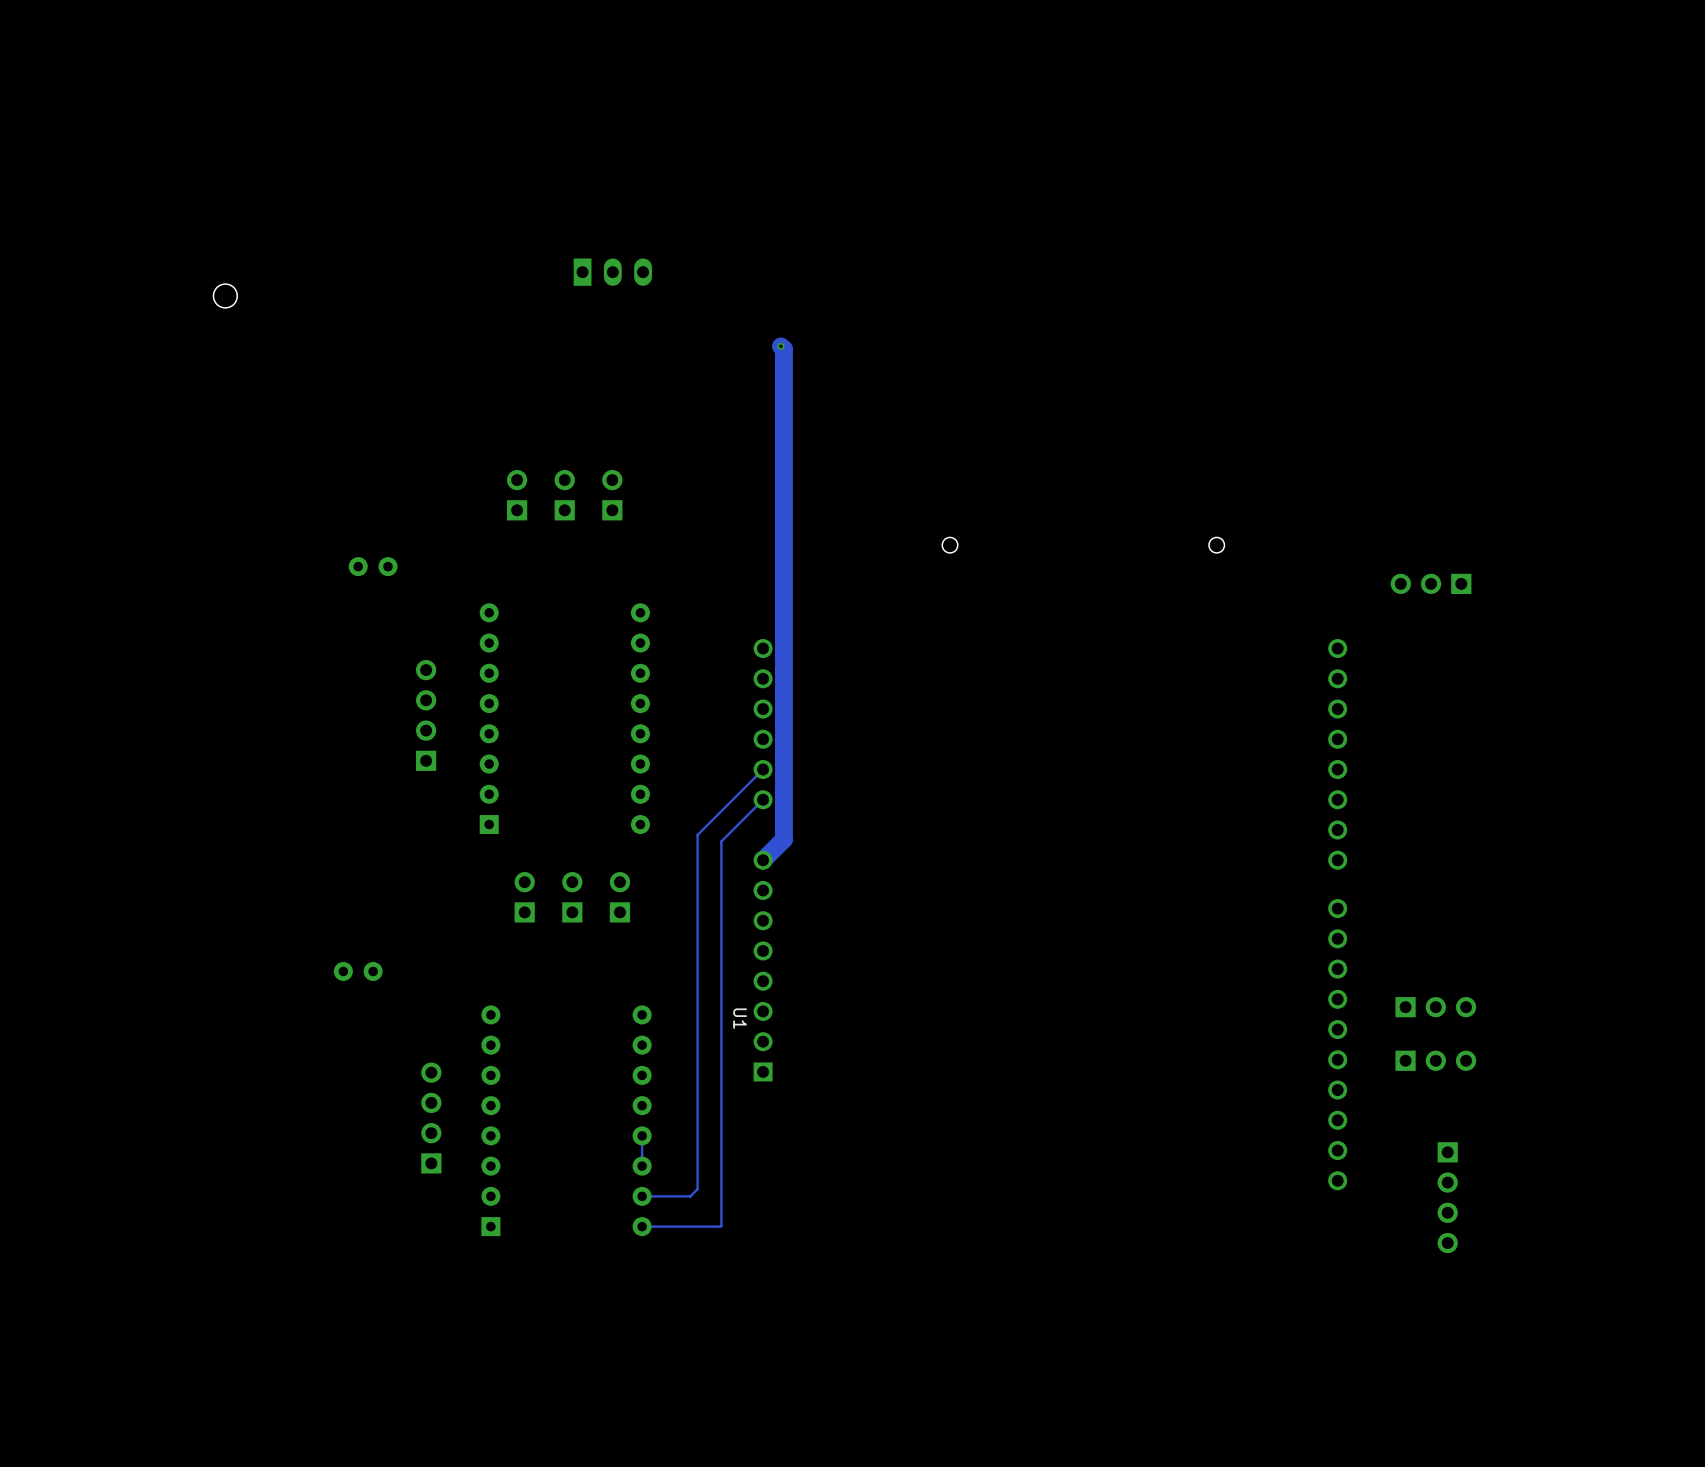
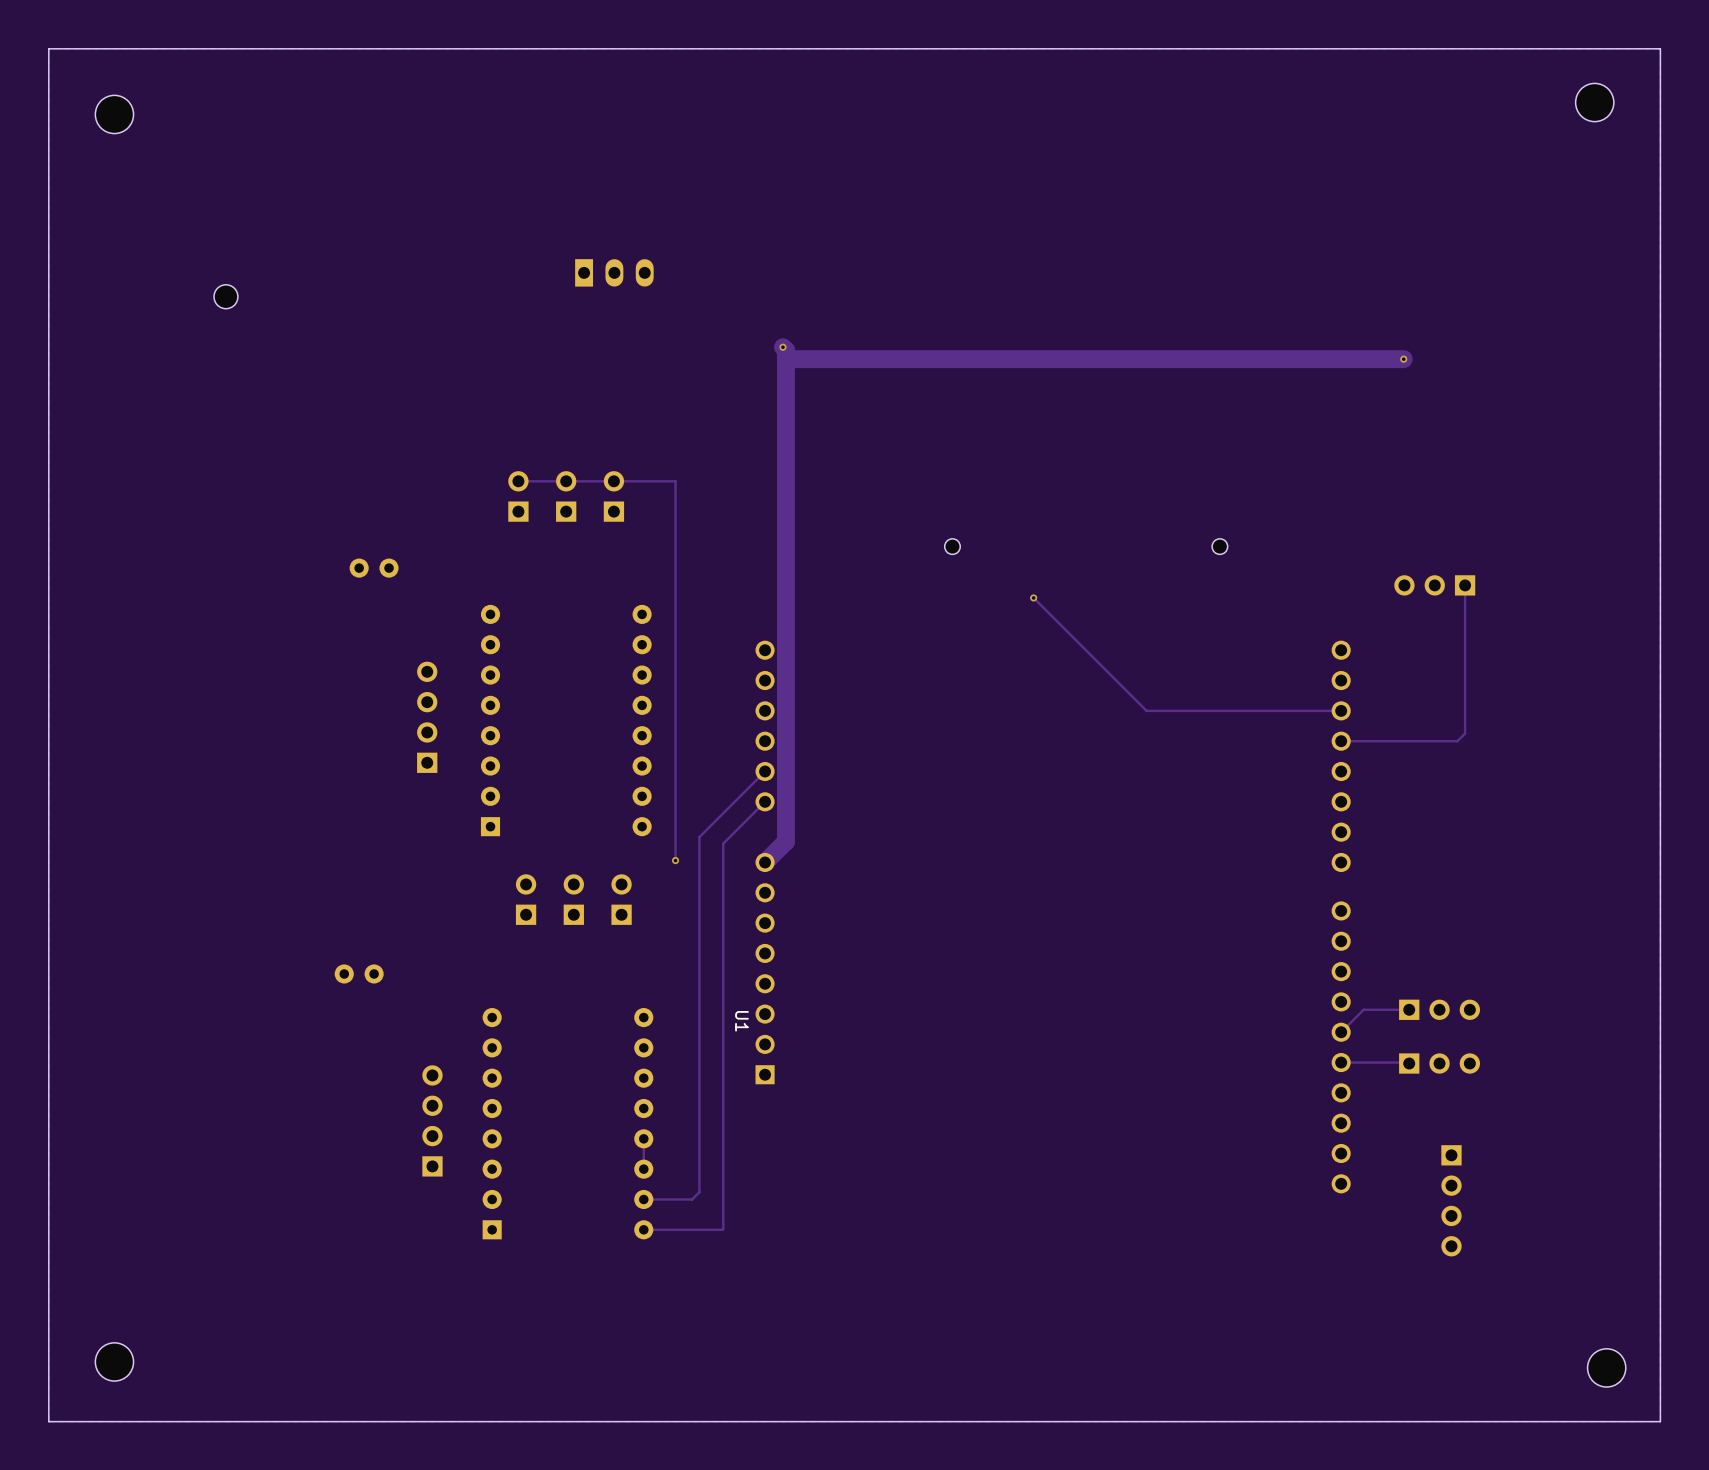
board edge: none -> (1660, 48) (48, 48) (48, 1421) (1660, 1421) (1660, 48)
part: none -> (1594, 102)
part: none -> (114, 114)
track: none -> (1403, 359) (785, 359)
via: none -> (1403, 359)
track: none -> (518, 481) (675, 481) (675, 860)
track: none -> (1465, 585) (1465, 733) (1457, 741) (1341, 741)
track: none -> (1033, 597) (1146, 710) (1341, 710)
via: none -> (1033, 597)
via: none -> (675, 860)
track: none -> (1409, 1009) (1363, 1009) (1341, 1032)
track: none -> (1341, 1062) (1409, 1063)
part: none -> (114, 1361)
part: none -> (1606, 1367)

